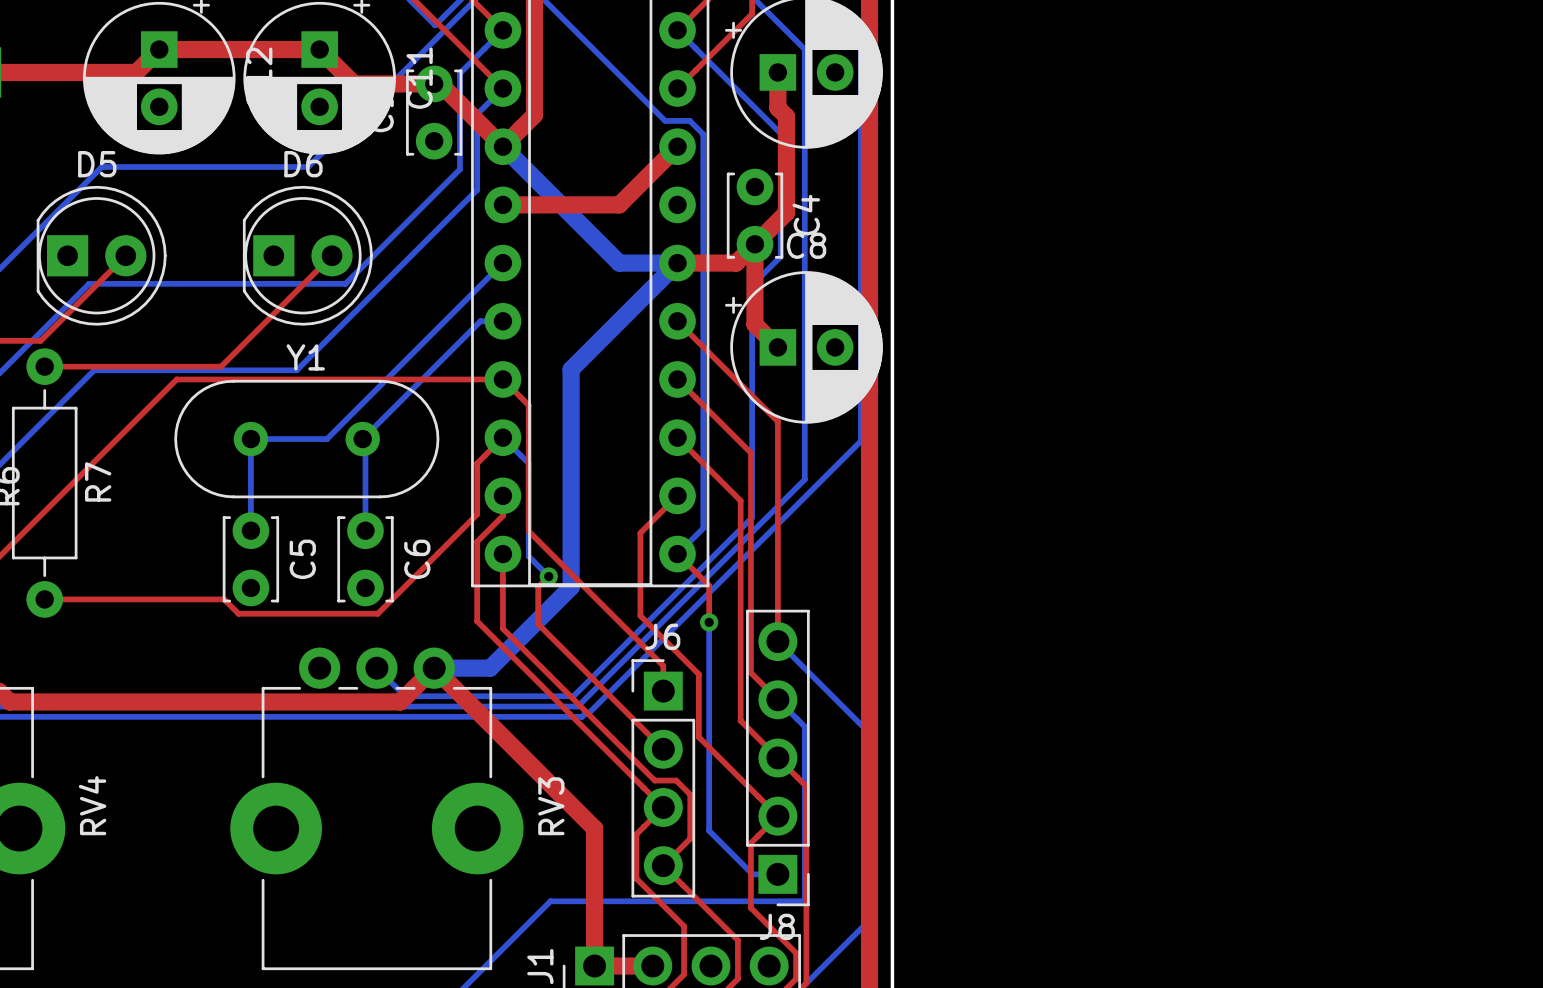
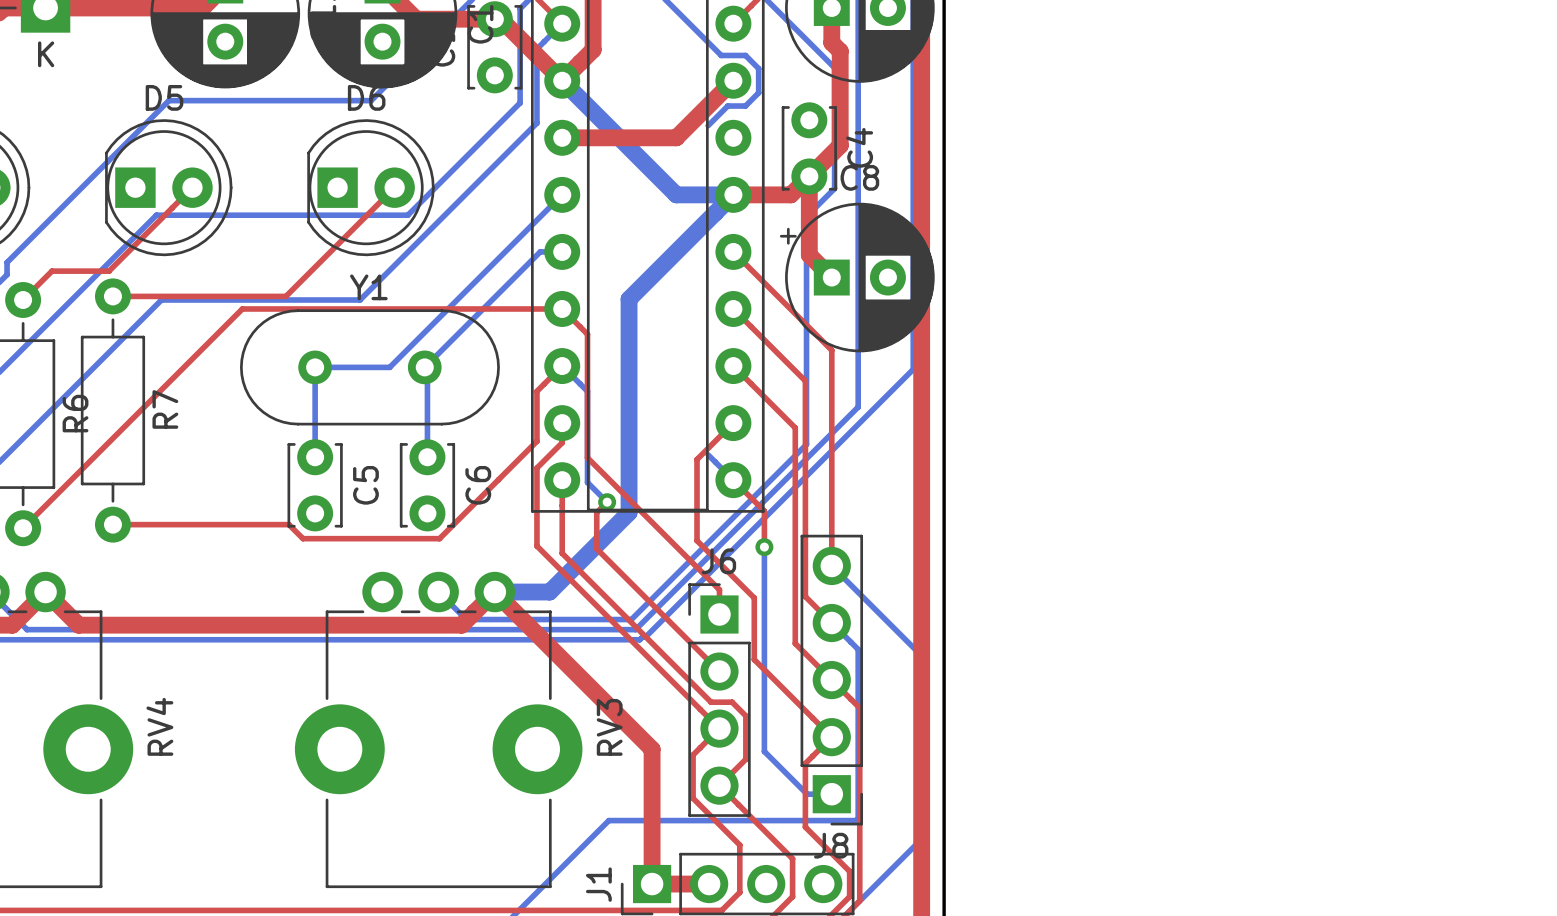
bottom track: (703, 159) (703, 528) (677, 554) -> (758, 92) (745, 106) (727, 106) (708, 125)
bottom track: none -> (708, 454) (733, 480)

